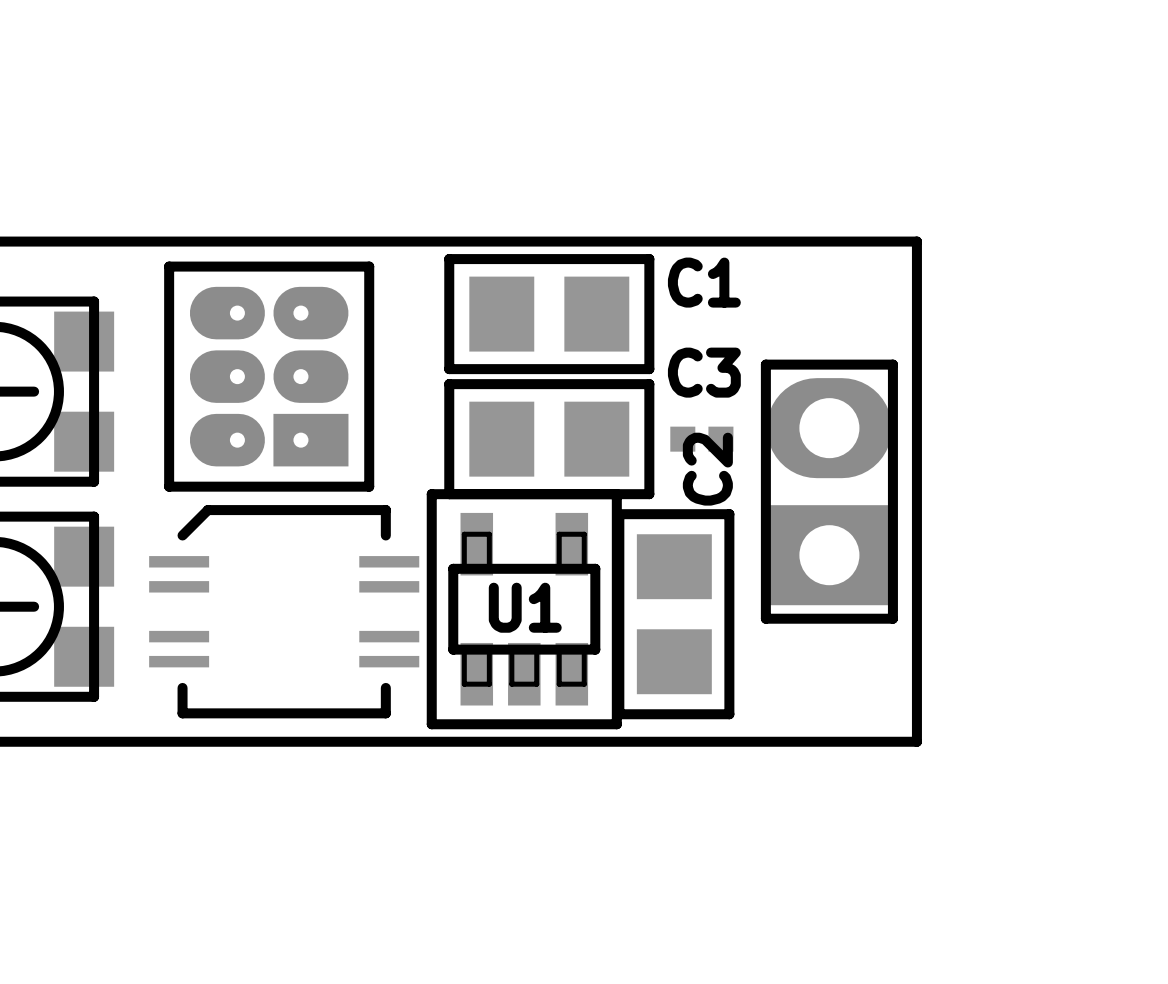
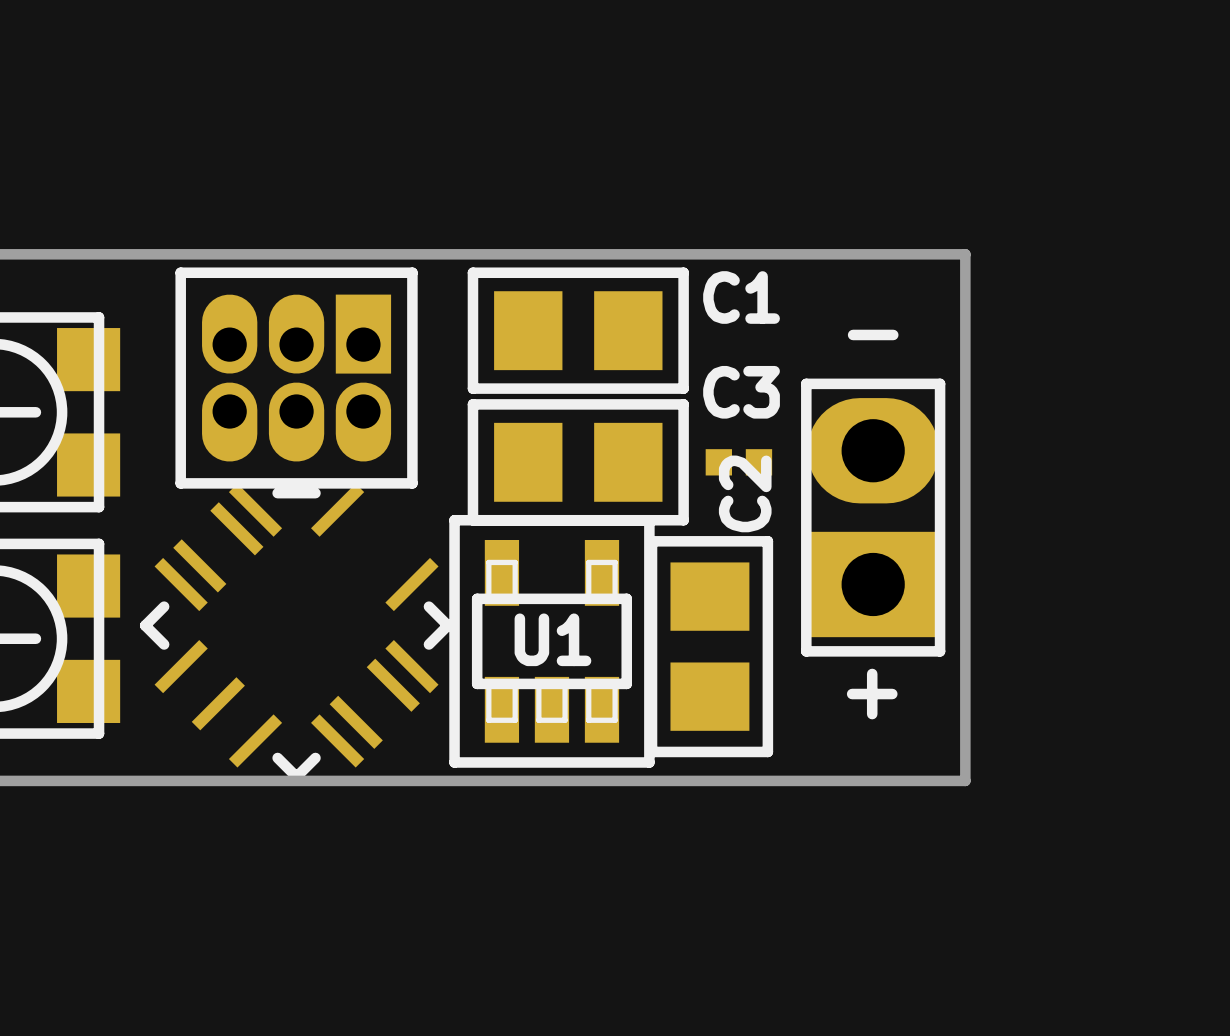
part footprint: [164, 261, 375, 492] -> [175, 267, 418, 489]
text: none -> - (873, 334)
part footprint: [149, 505, 420, 719] -> [139, 483, 454, 783]
text: none -> + (872, 694)

